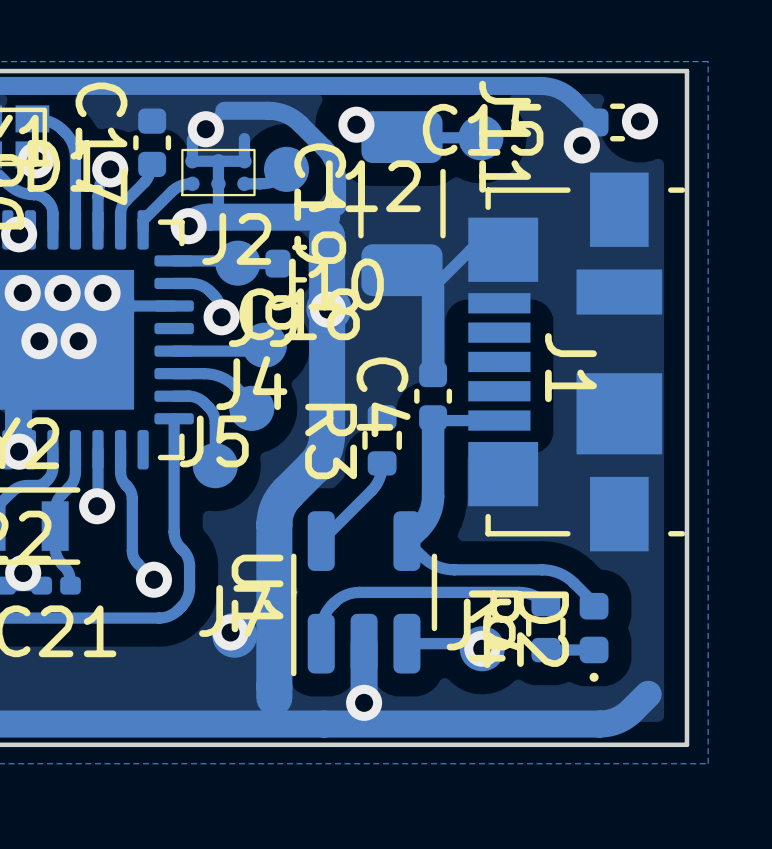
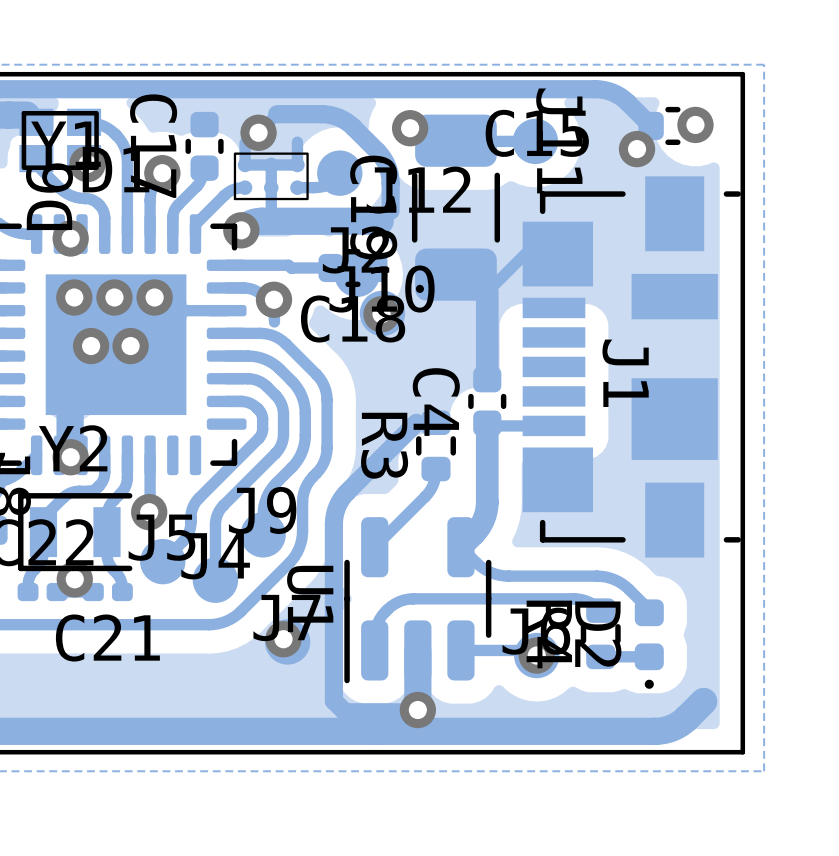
track: (327, 236) (326, 439) (319, 459) (284, 496) (275, 516) (274, 697) -> none
J2 position: (237, 263) -> (357, 274)
via position: (221, 317) -> (273, 299)
J9 position: (264, 345) -> (263, 534)
track: (260, 351) (195, 351) -> (263, 534) (263, 510) (266, 497) (273, 486) (295, 464) (303, 448) (305, 408) (297, 388) (280, 369) (265, 359) (247, 356)
track: (195, 373) (212, 374) (225, 378) (251, 402) -> (247, 378) (262, 383) (280, 401) (283, 411) (283, 439) (277, 451) (218, 511) (215, 524) (215, 580)
track: (205, 404) (212, 411) (215, 420) (215, 465) -> (258, 409) (262, 417) (260, 436) (197, 500) (192, 509) (187, 535) (162, 561)
J4 position: (251, 408) -> (215, 580)
track: none -> (436, 422) (416, 422) (344, 495) (337, 506) (334, 519) (333, 700) (345, 712) (415, 712) (417, 710)
track: (174, 418) (174, 534) (176, 542) (188, 560) (189, 590) (185, 602) (176, 611) (166, 616) (156, 618) -> (226, 333) (260, 333) (274, 336) (285, 343) (316, 374) (322, 381) (326, 395) (327, 447) (322, 465) (310, 480) (303, 492) (302, 535) (294, 556) (237, 614) (226, 621) (208, 624)
track: (120, 449) (120, 475) (132, 497) (133, 555) (136, 562) (153, 579) -> none
J5 position: (215, 465) -> (162, 561)
via: (153, 579) -> none

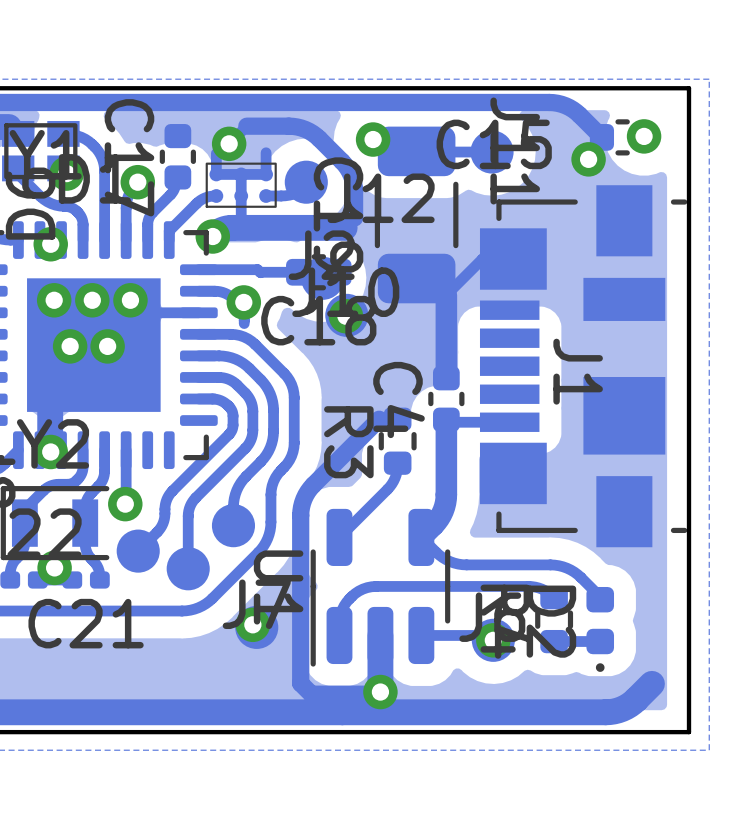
J9 name: J9 (262, 510) -> none
J5 name: J5 (161, 537) -> none
J4 name: J4 (215, 556) -> none

